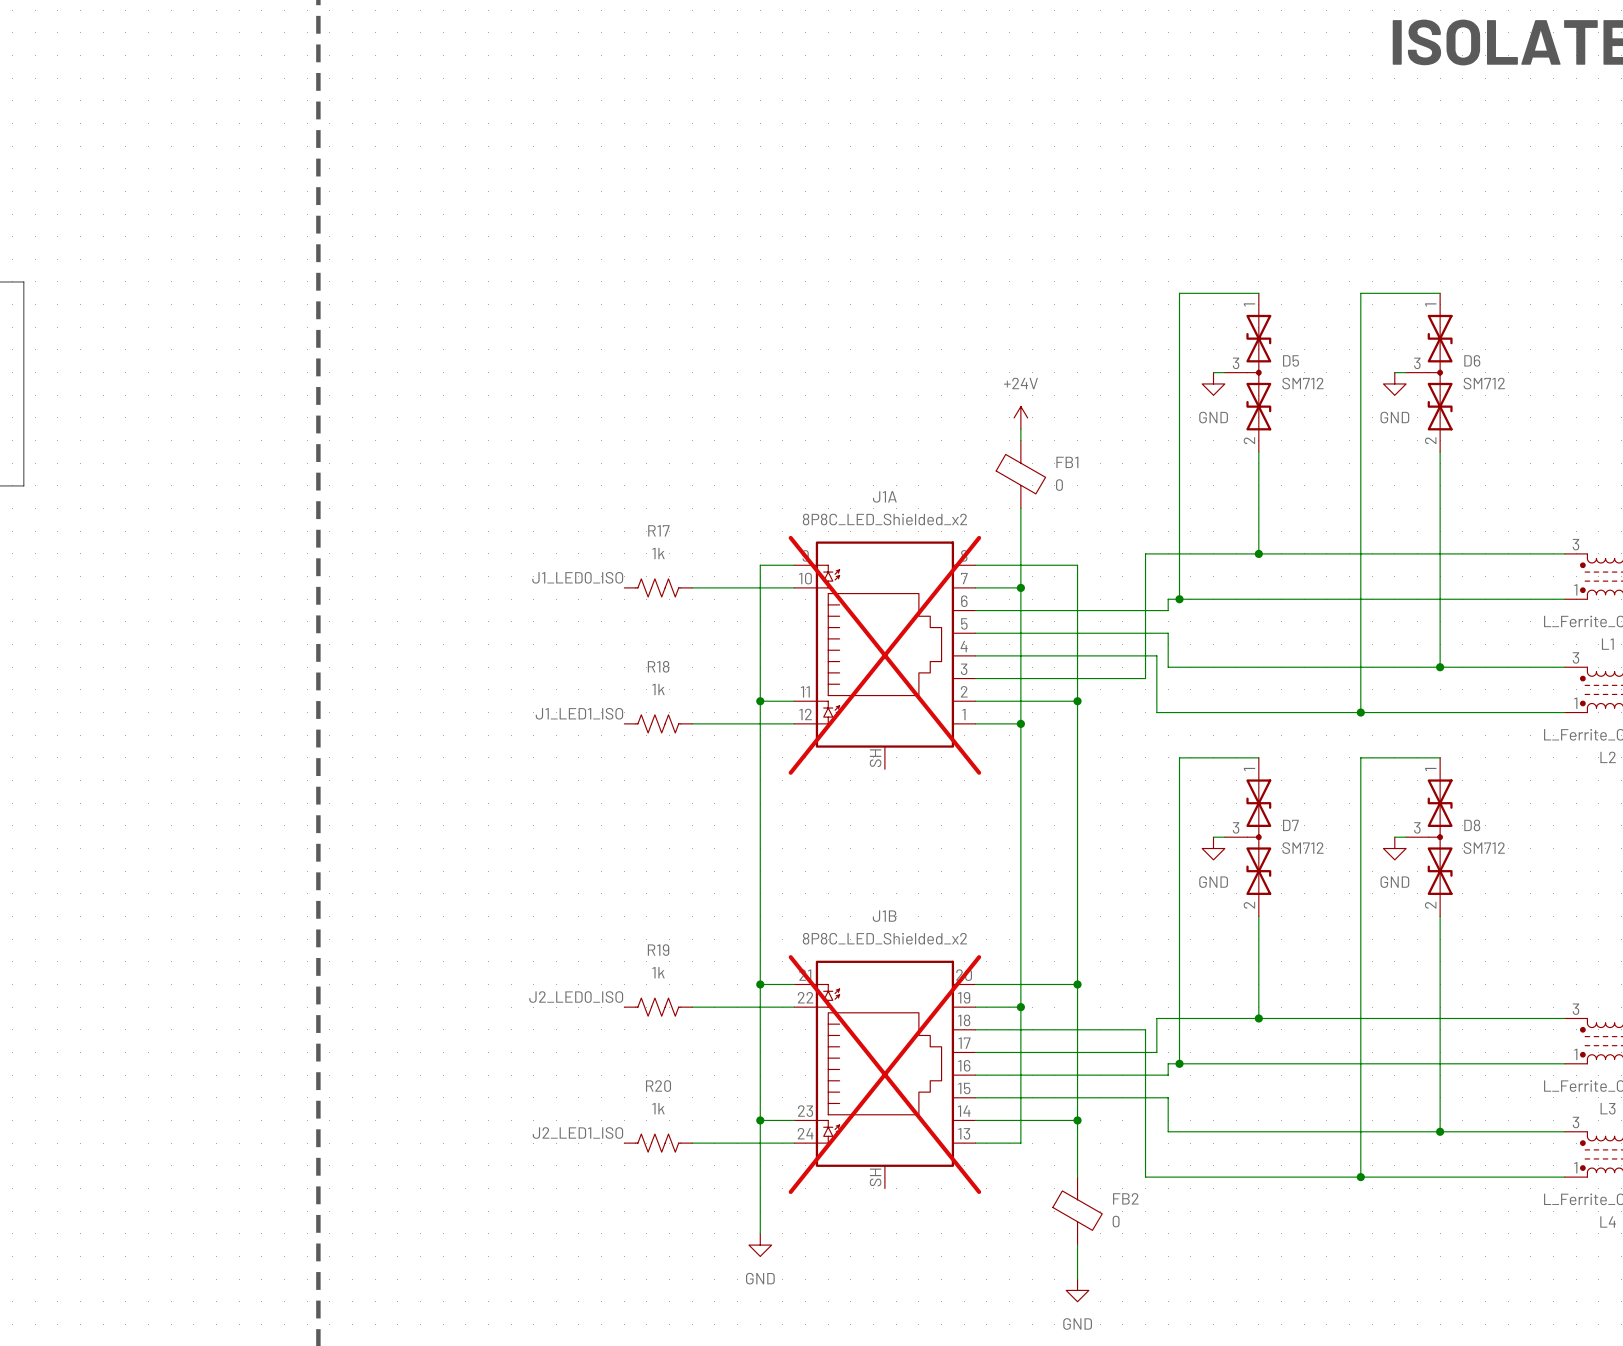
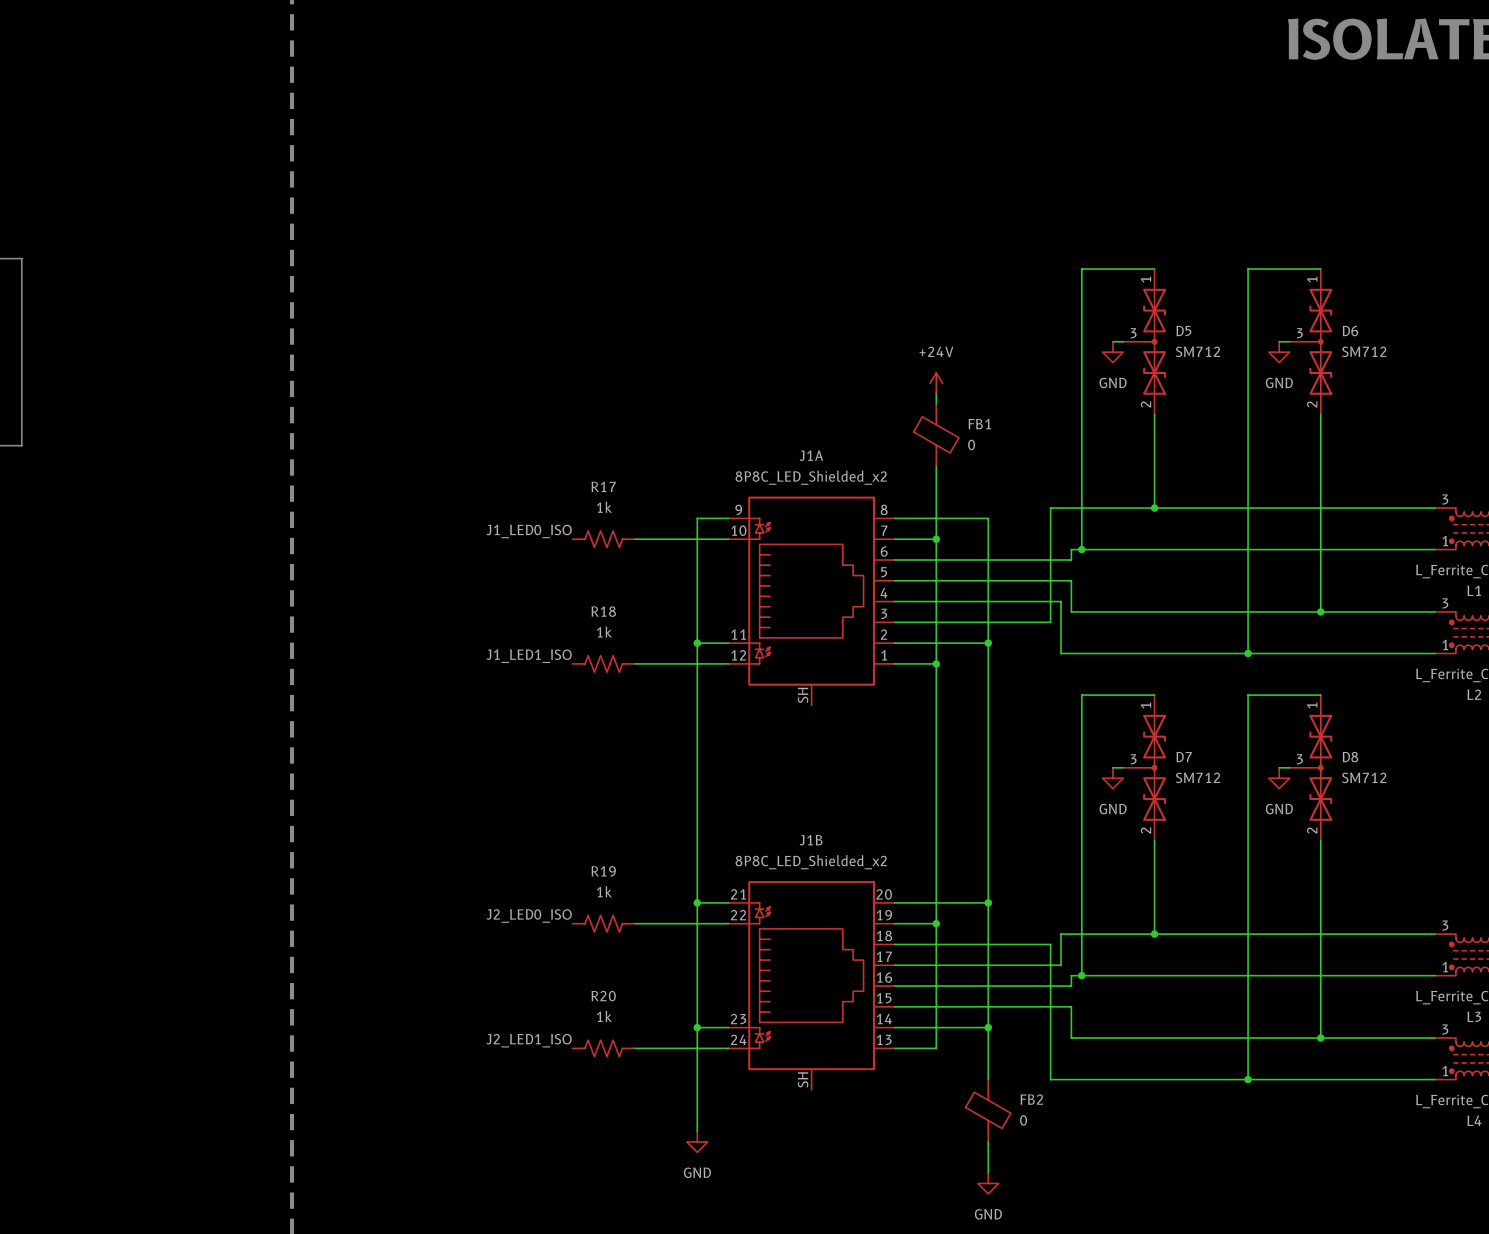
J1A do-not-place cross: (884, 655) -> none
J1B do-not-place cross: (884, 1074) -> none

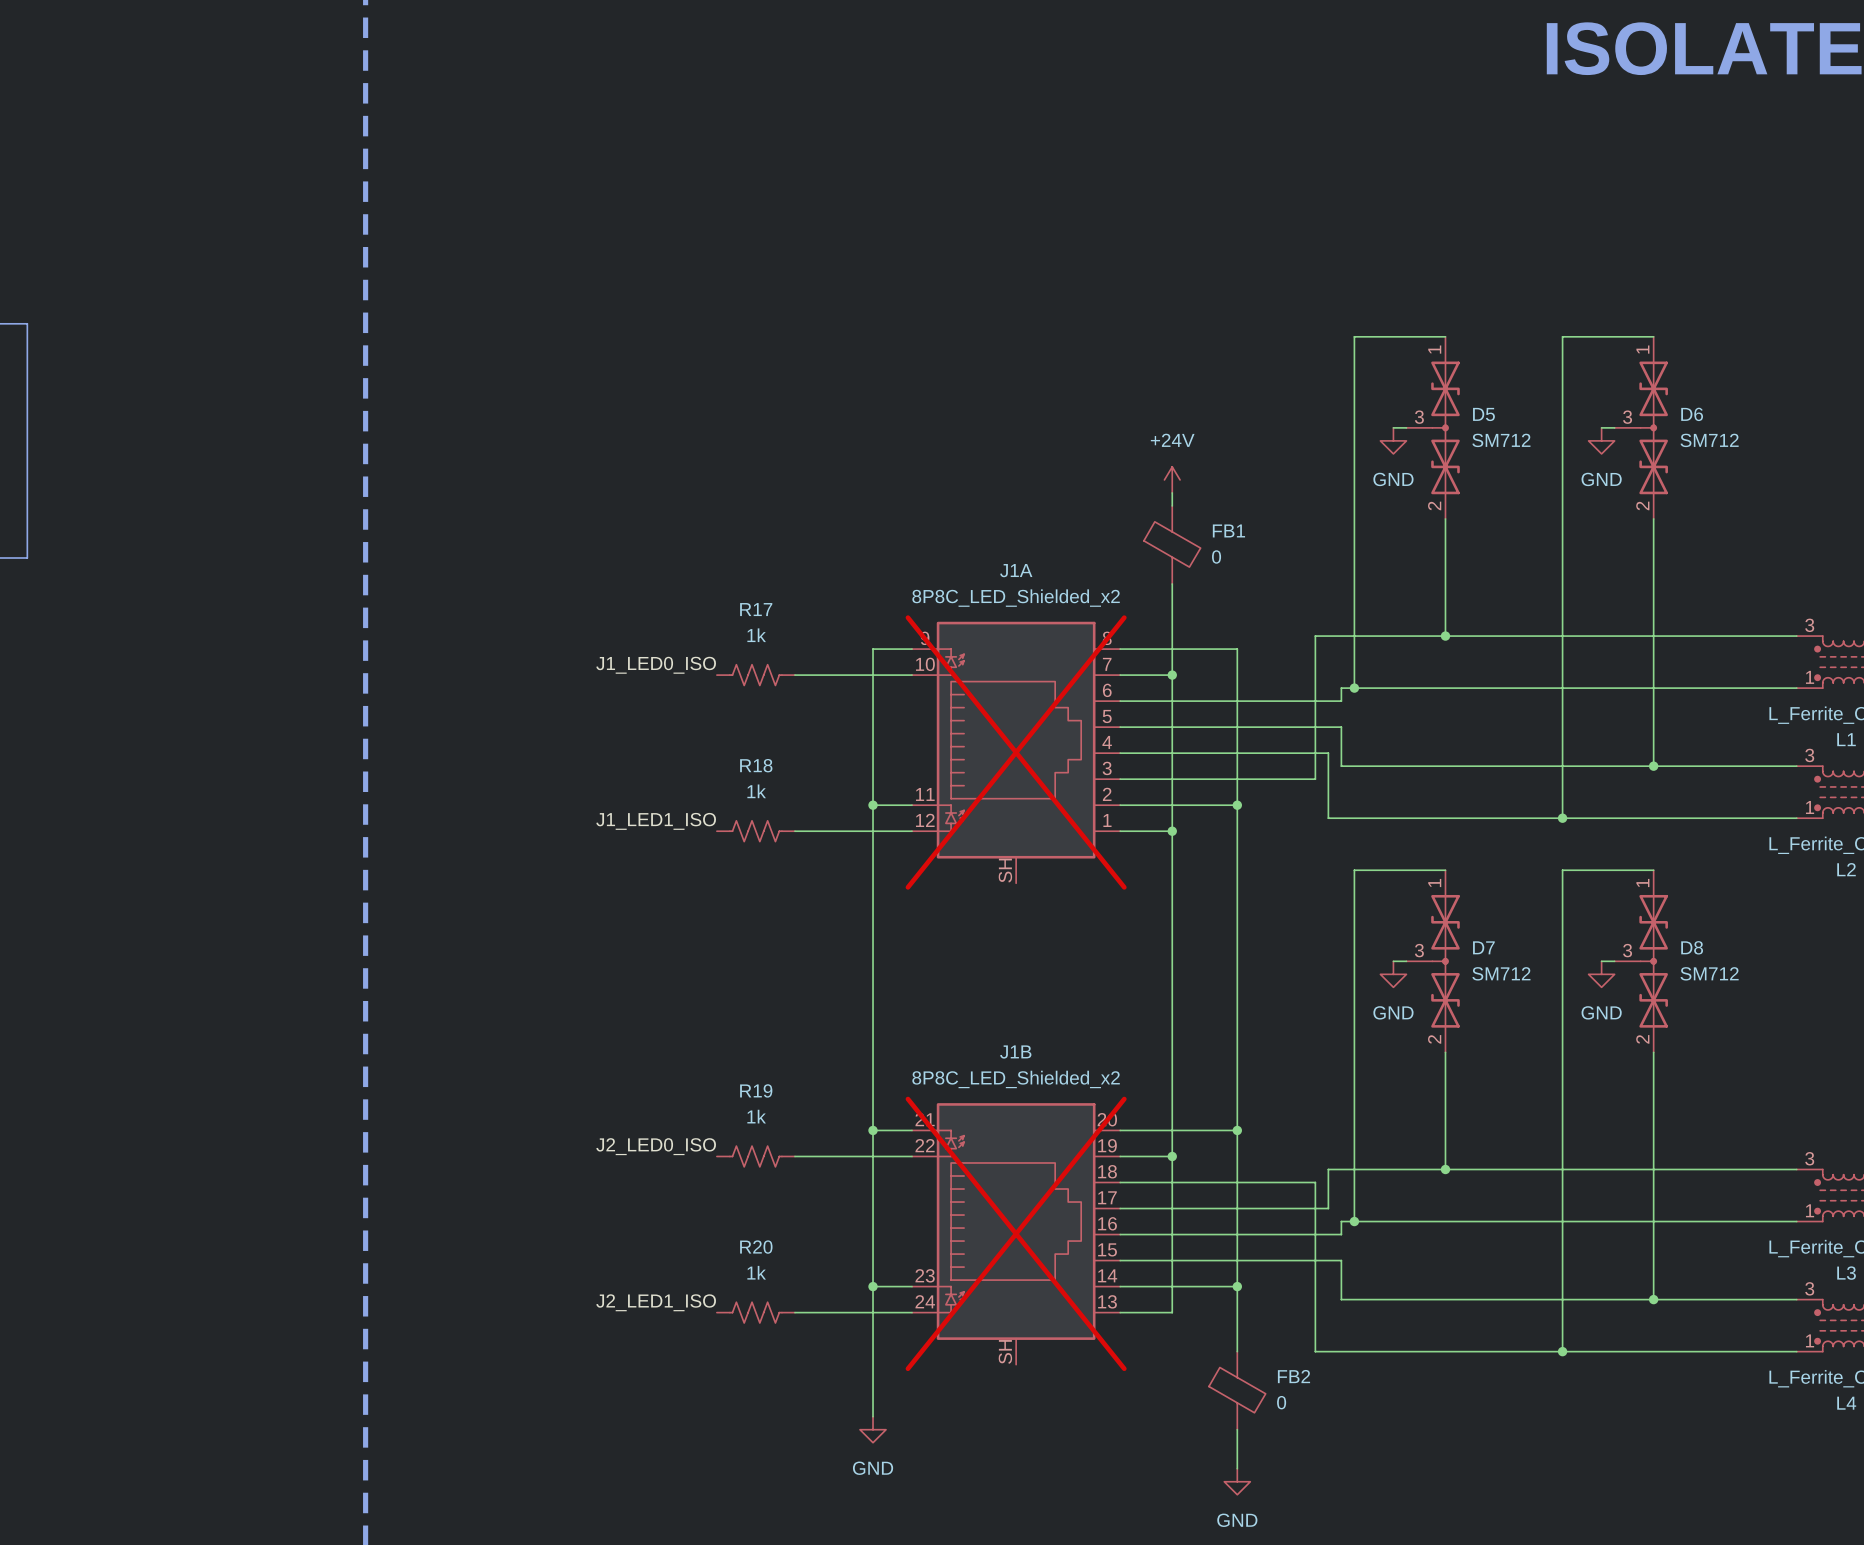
J1A do-not-place cross: none -> (1016, 752)
J1B do-not-place cross: none -> (1016, 1233)

